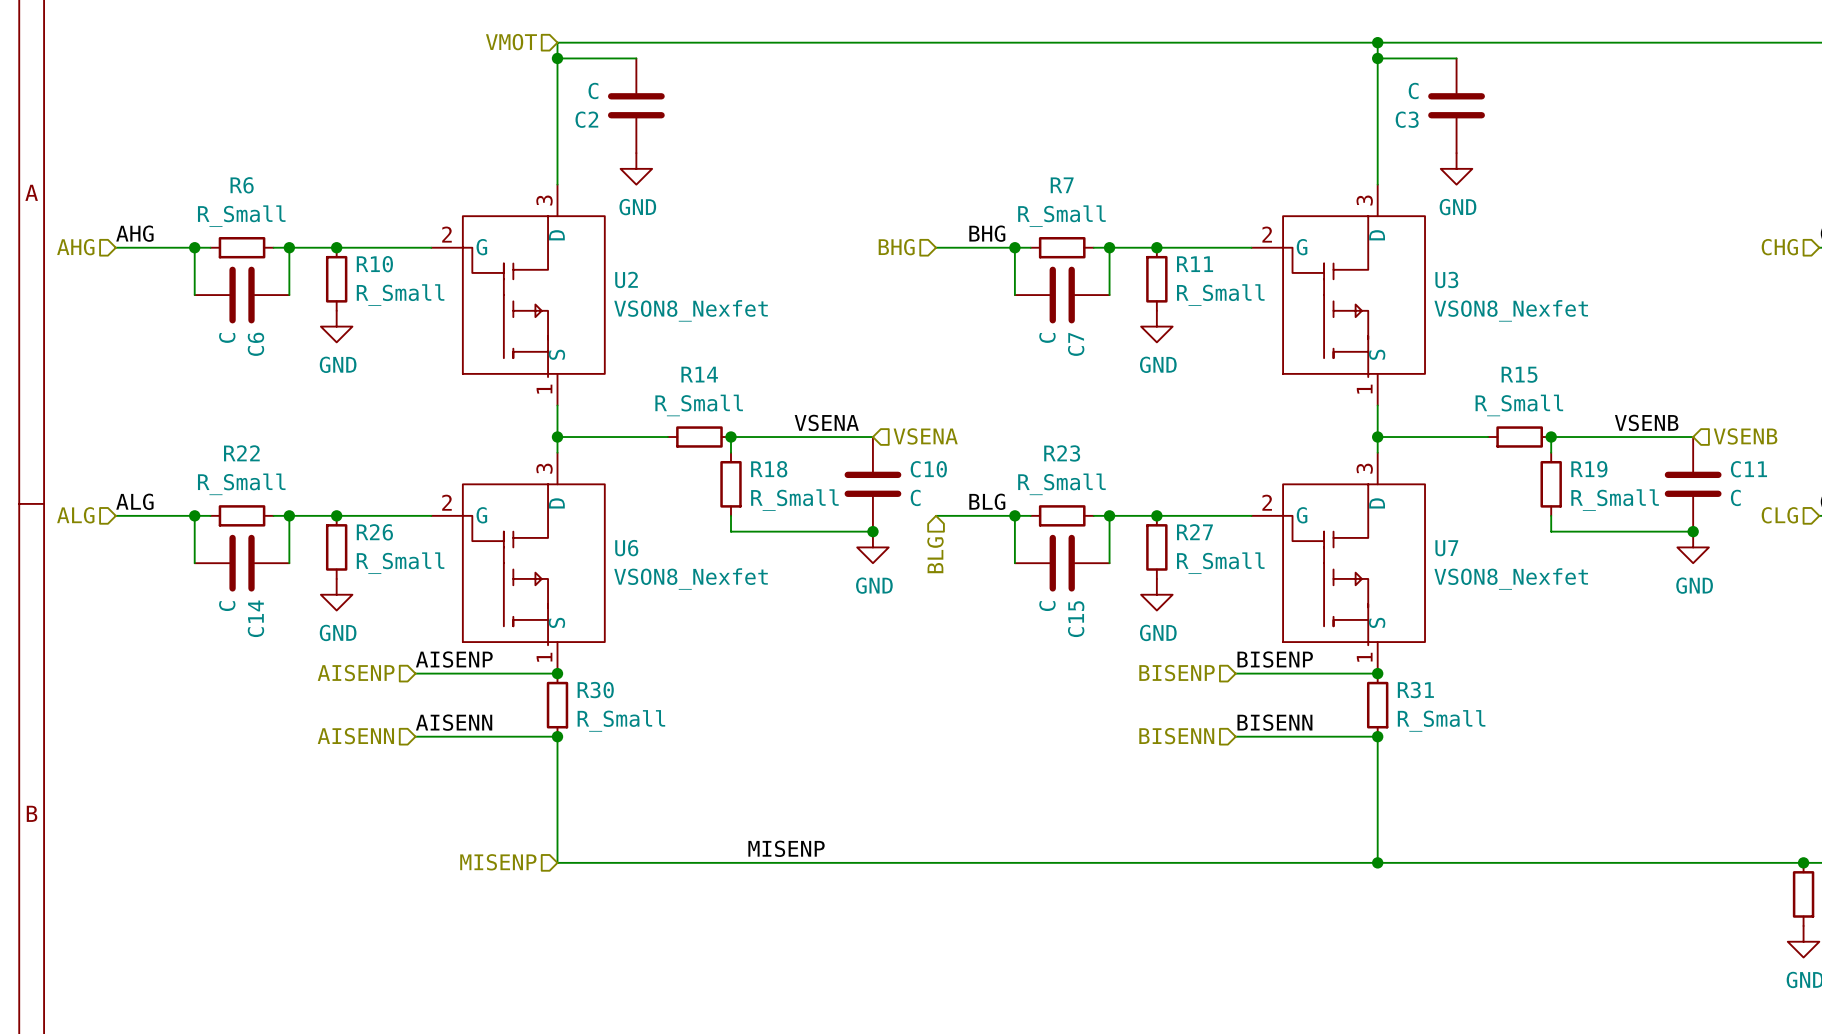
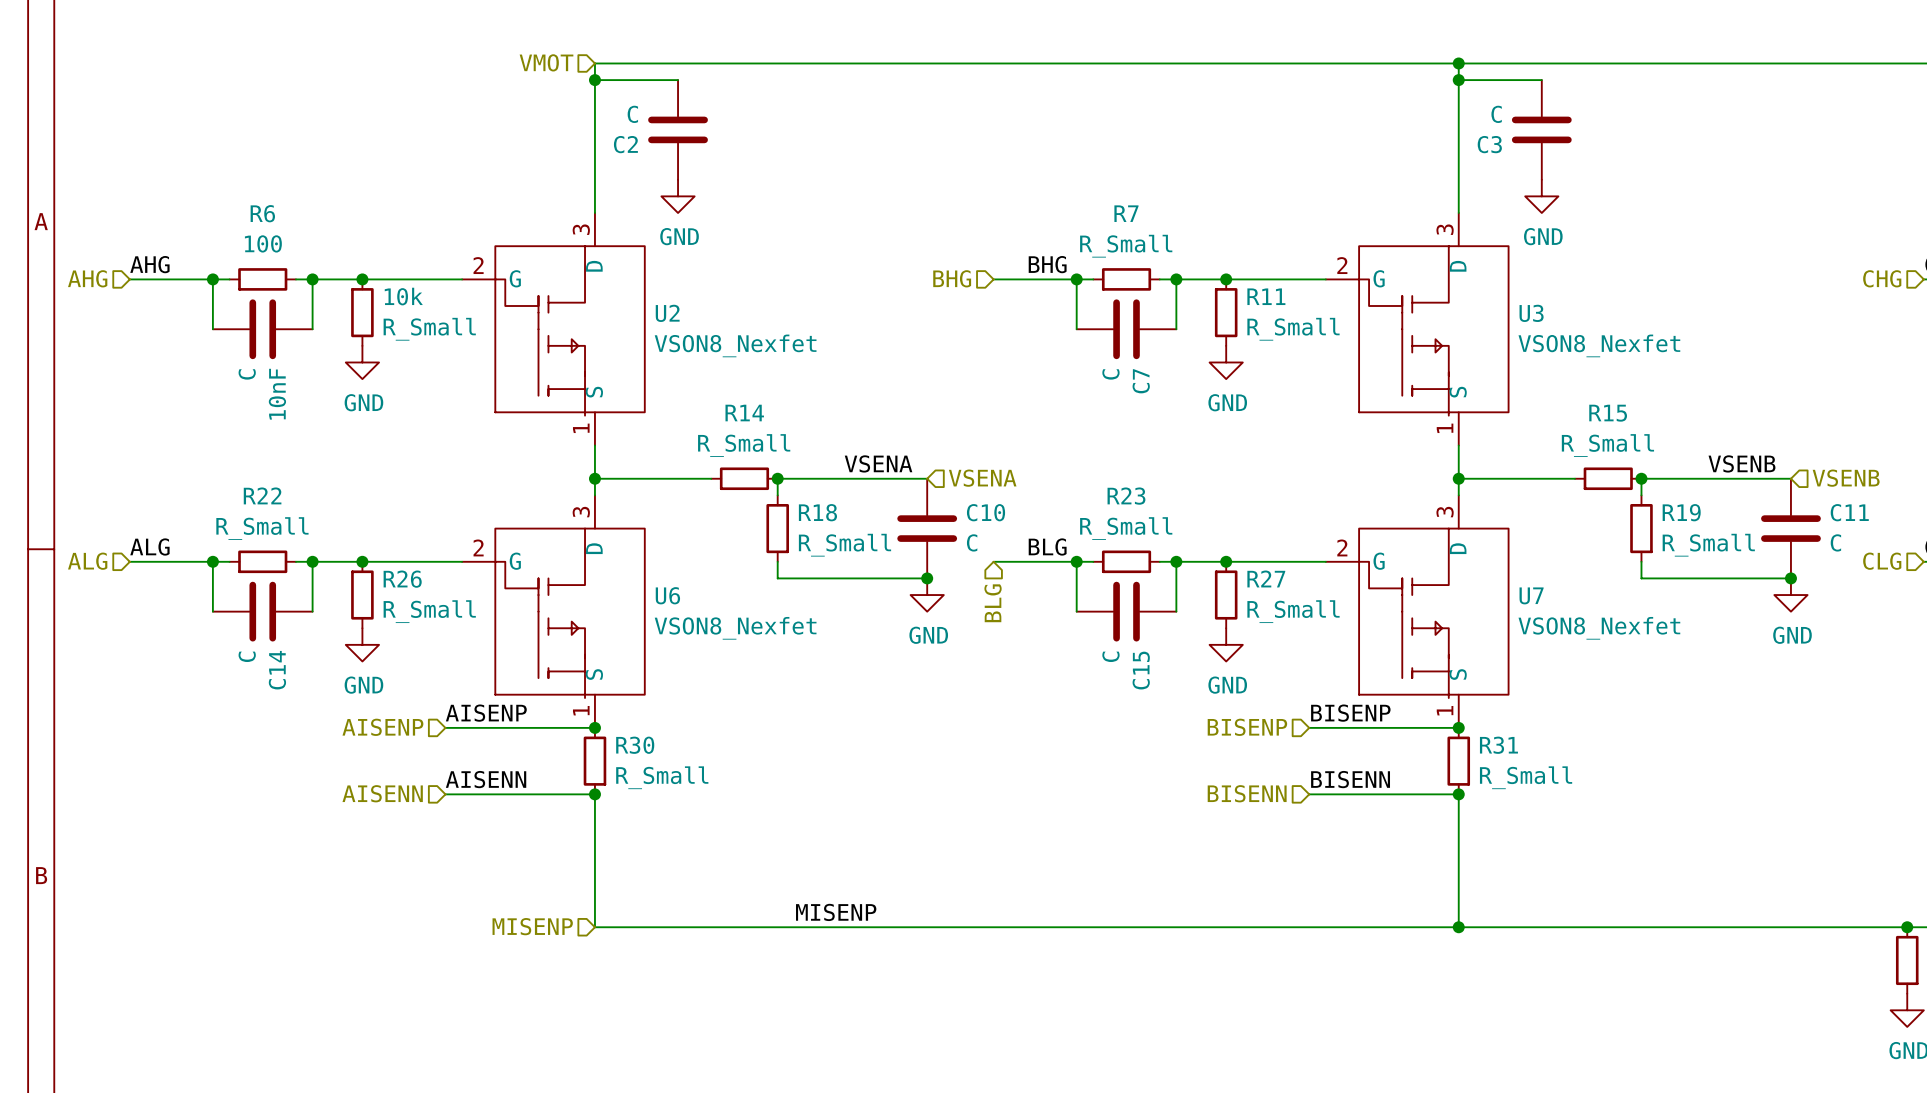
R6 value: R_Small (241, 216) -> 100 (263, 243)
R10 name: R10 (374, 264) -> 10k (403, 296)
C6 name: C6 (255, 344) -> 10nF (277, 394)

